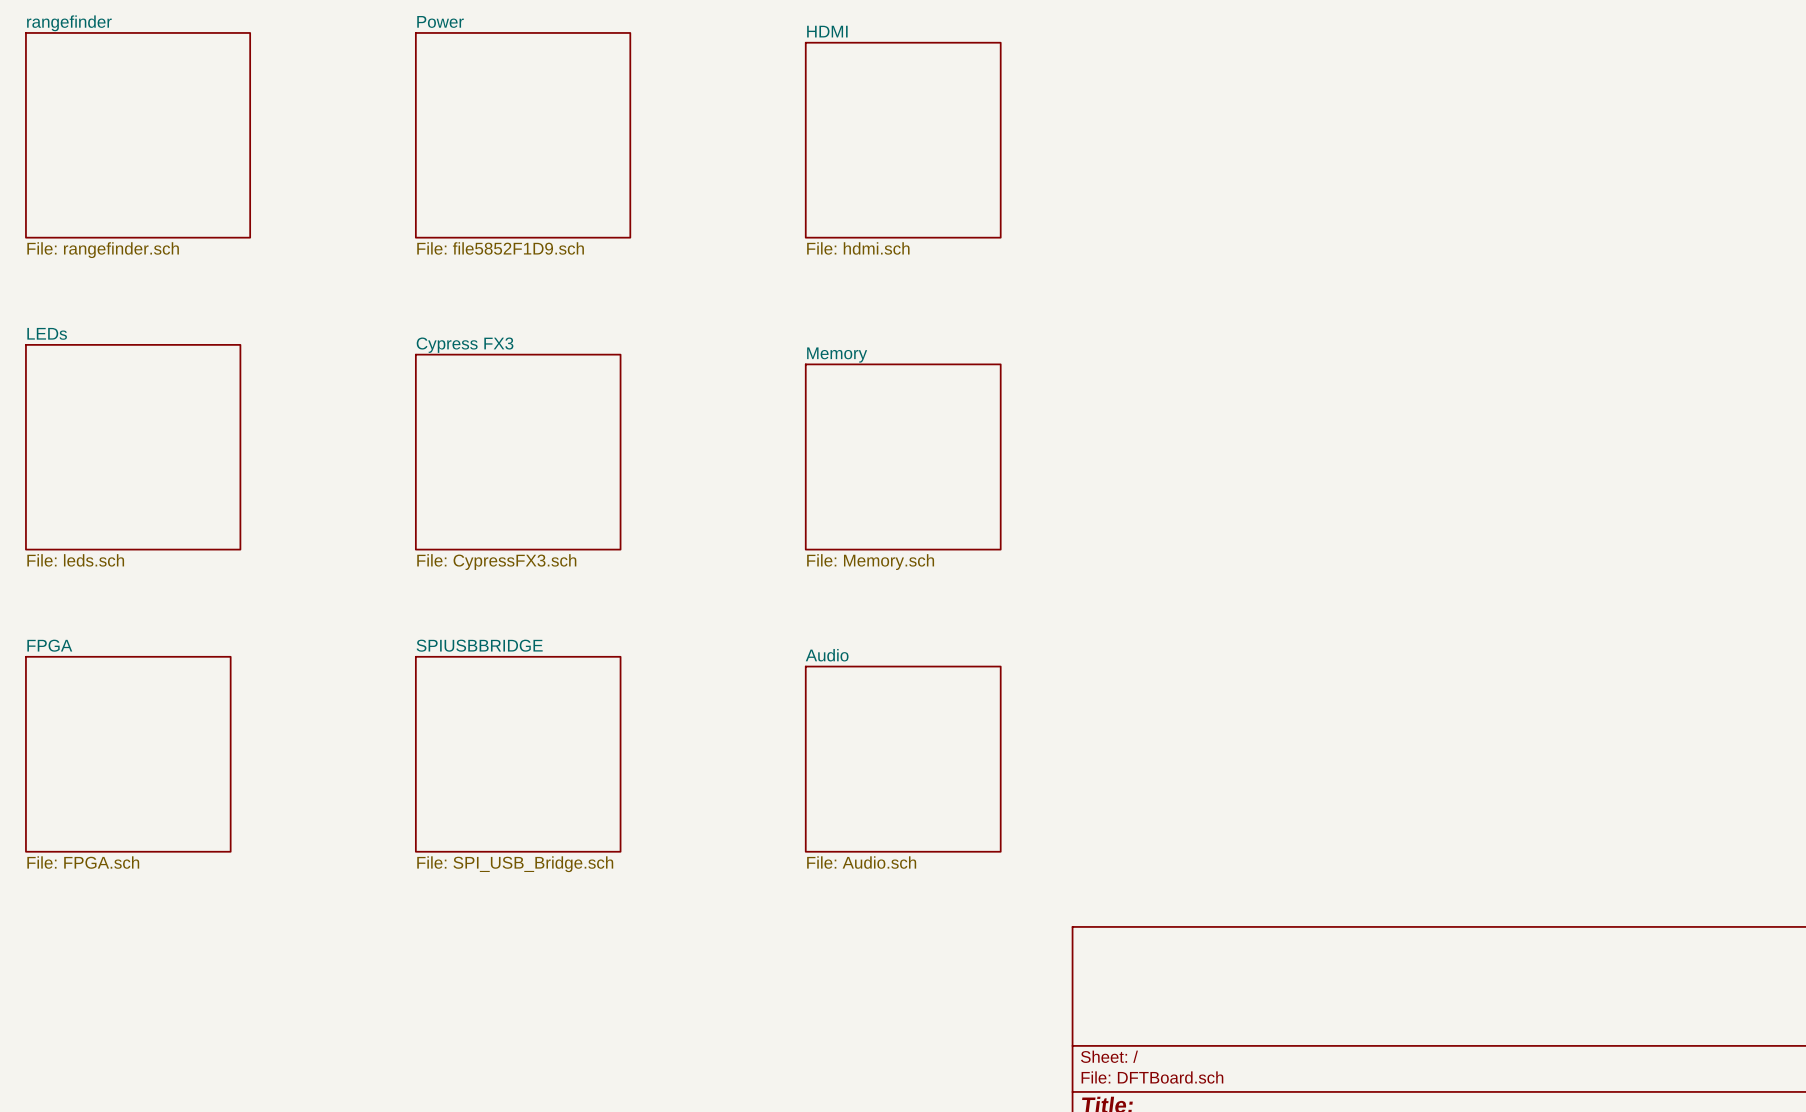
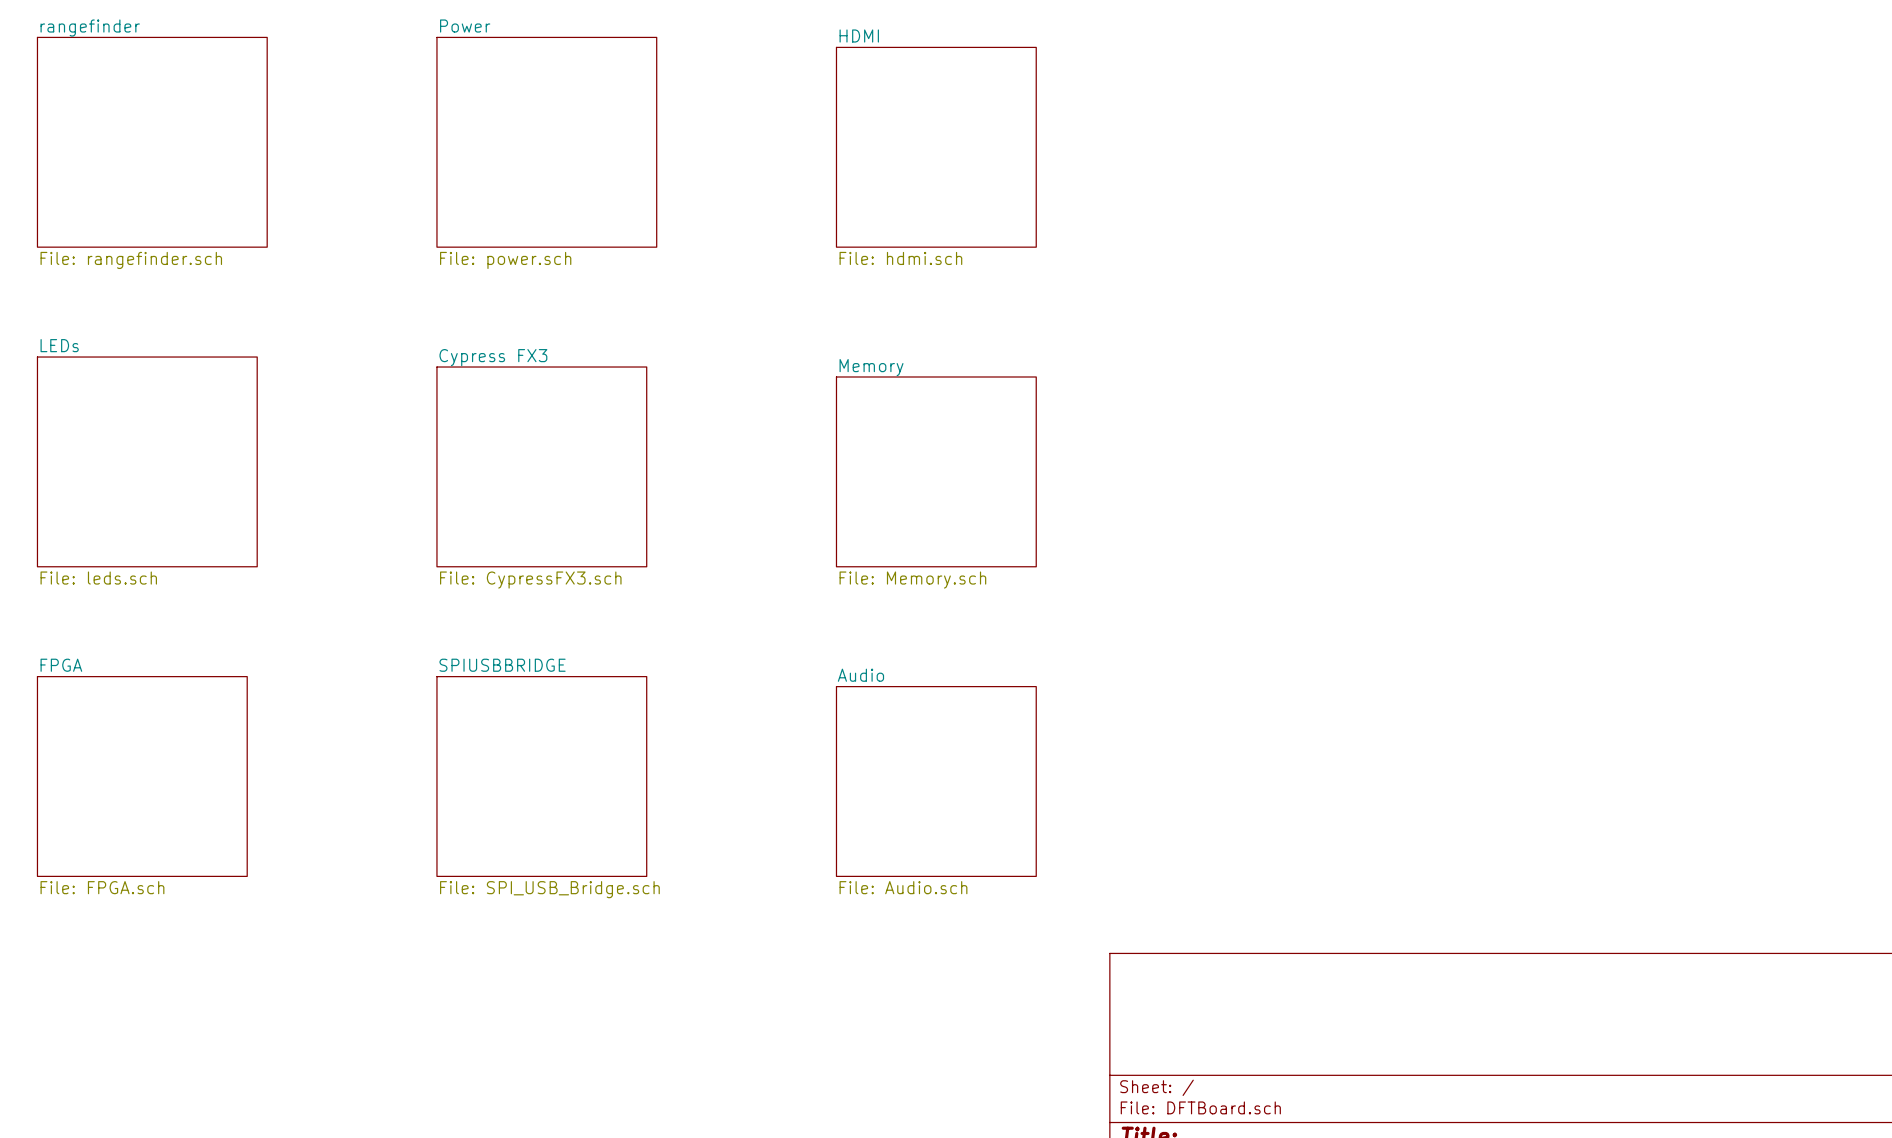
sheet Power value: File: file5852F1D9.sch (500, 248) -> File: power.sch (505, 260)

